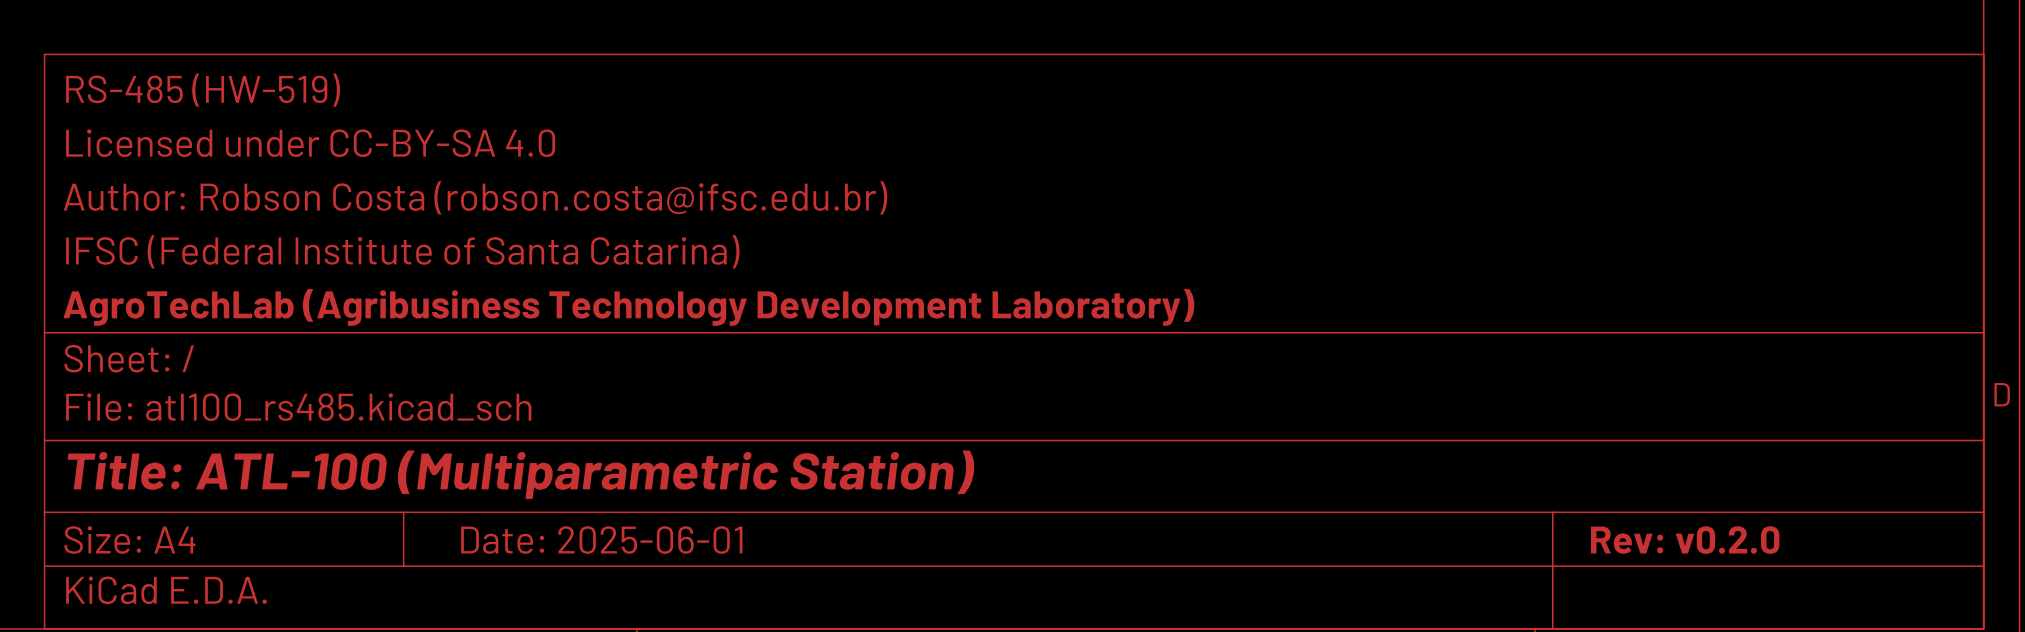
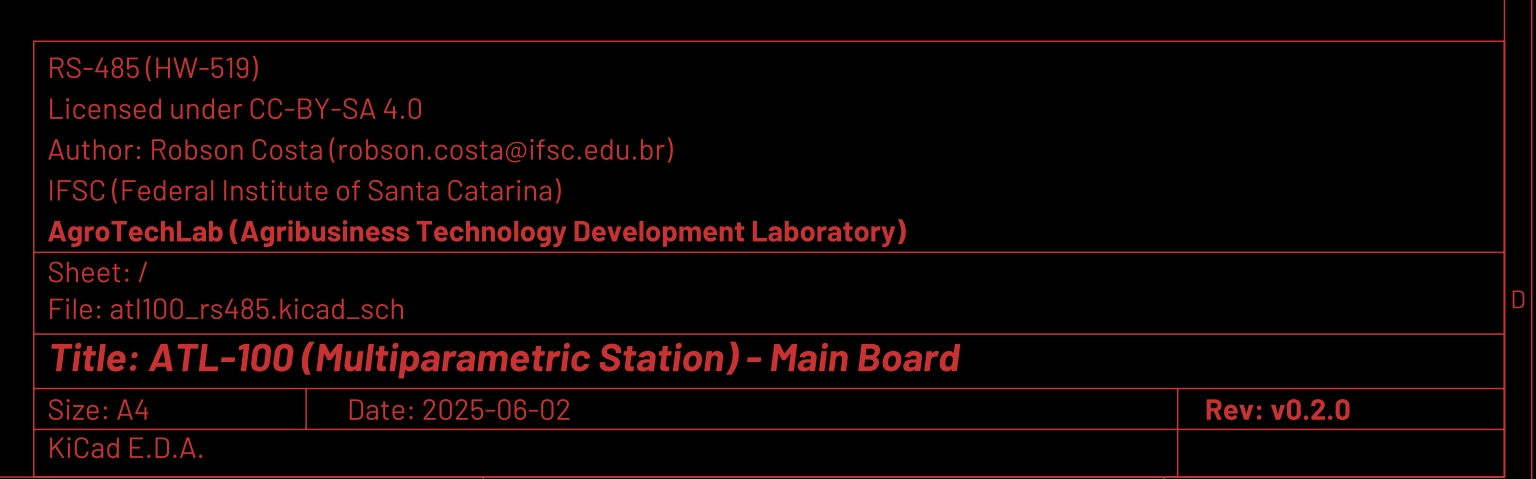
title block: Title: ATL-100 (Multiparametric Station) (521, 474) -> Title: ATL-100 (Multiparametric Station) - Main Board (505, 360)
title block: Date: 2025-06-01 (601, 540) -> Date: 2025-06-02 (459, 409)

